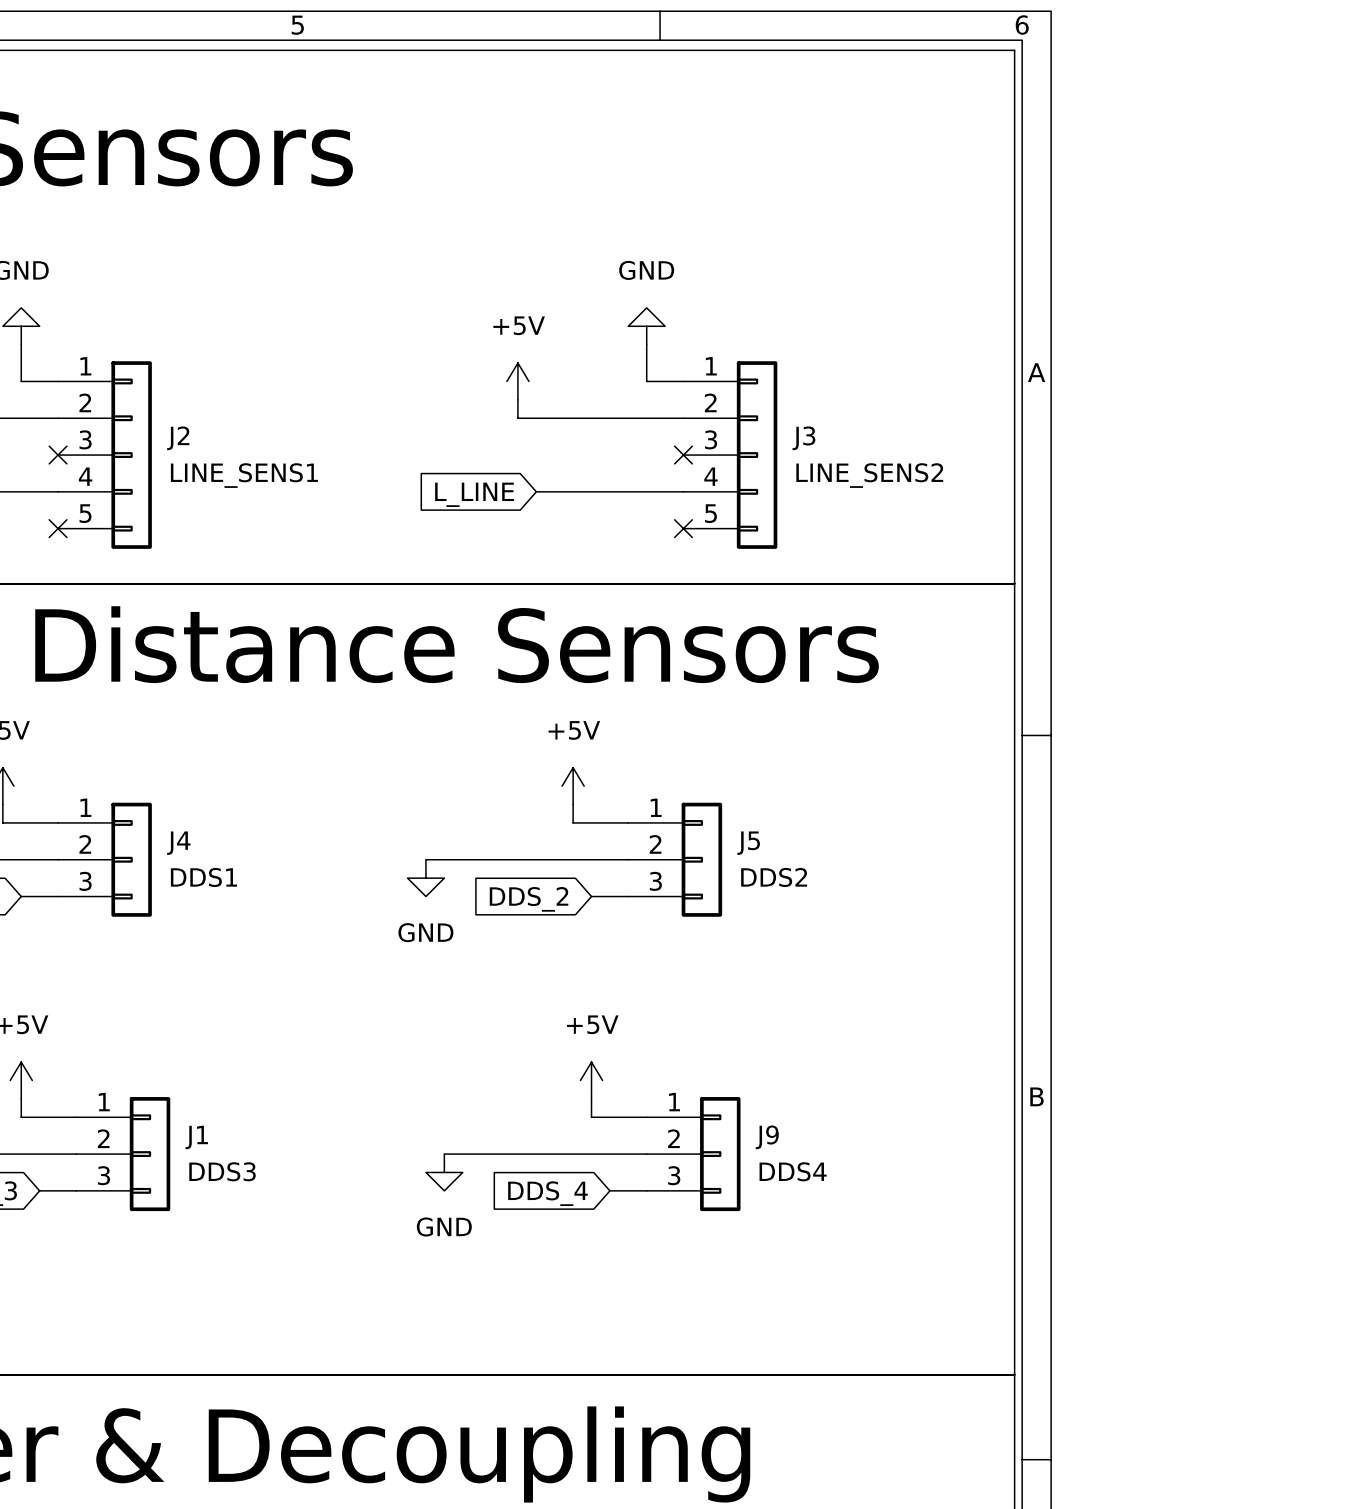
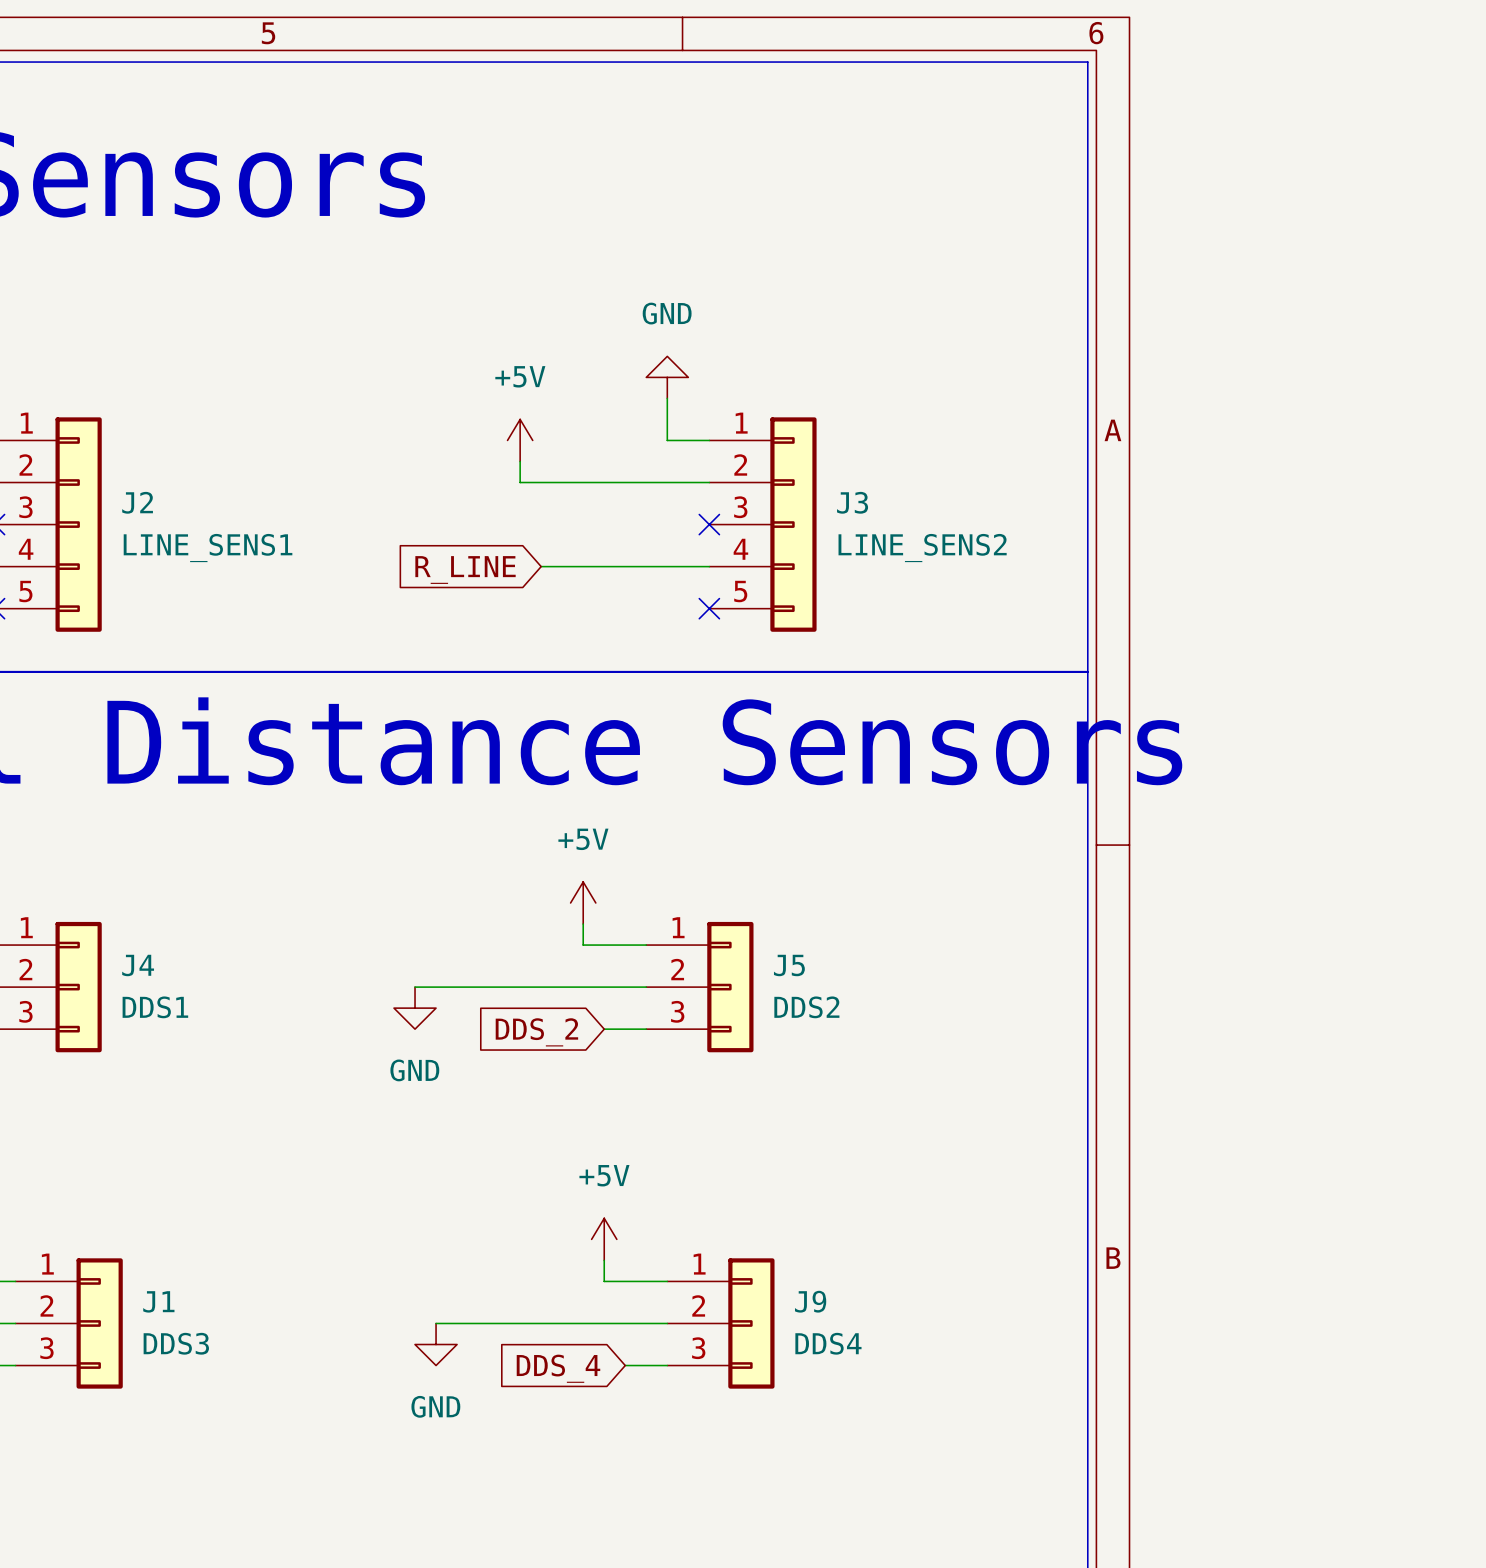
global label: L_LINE (474, 494) -> R_LINE (465, 570)

